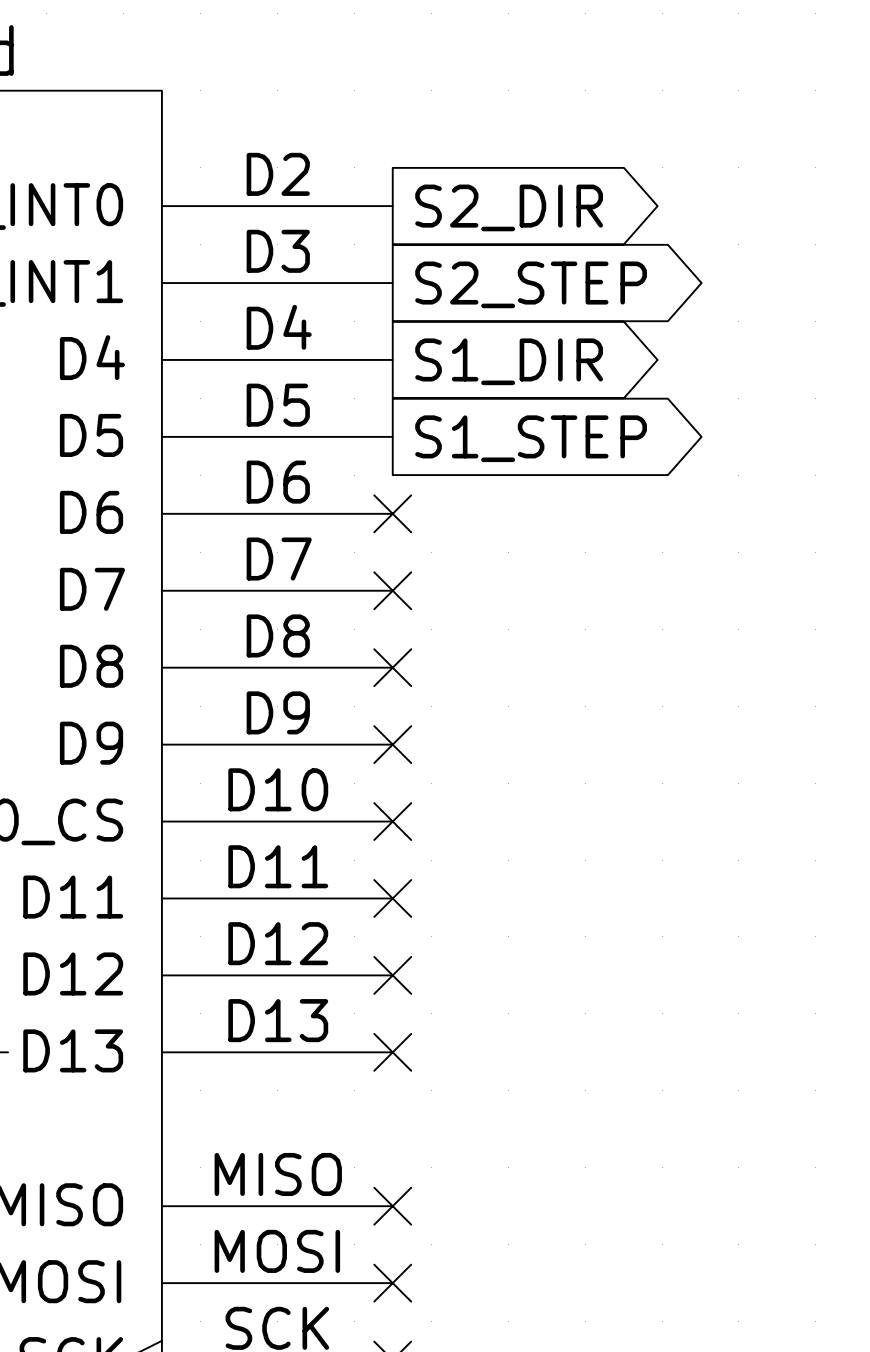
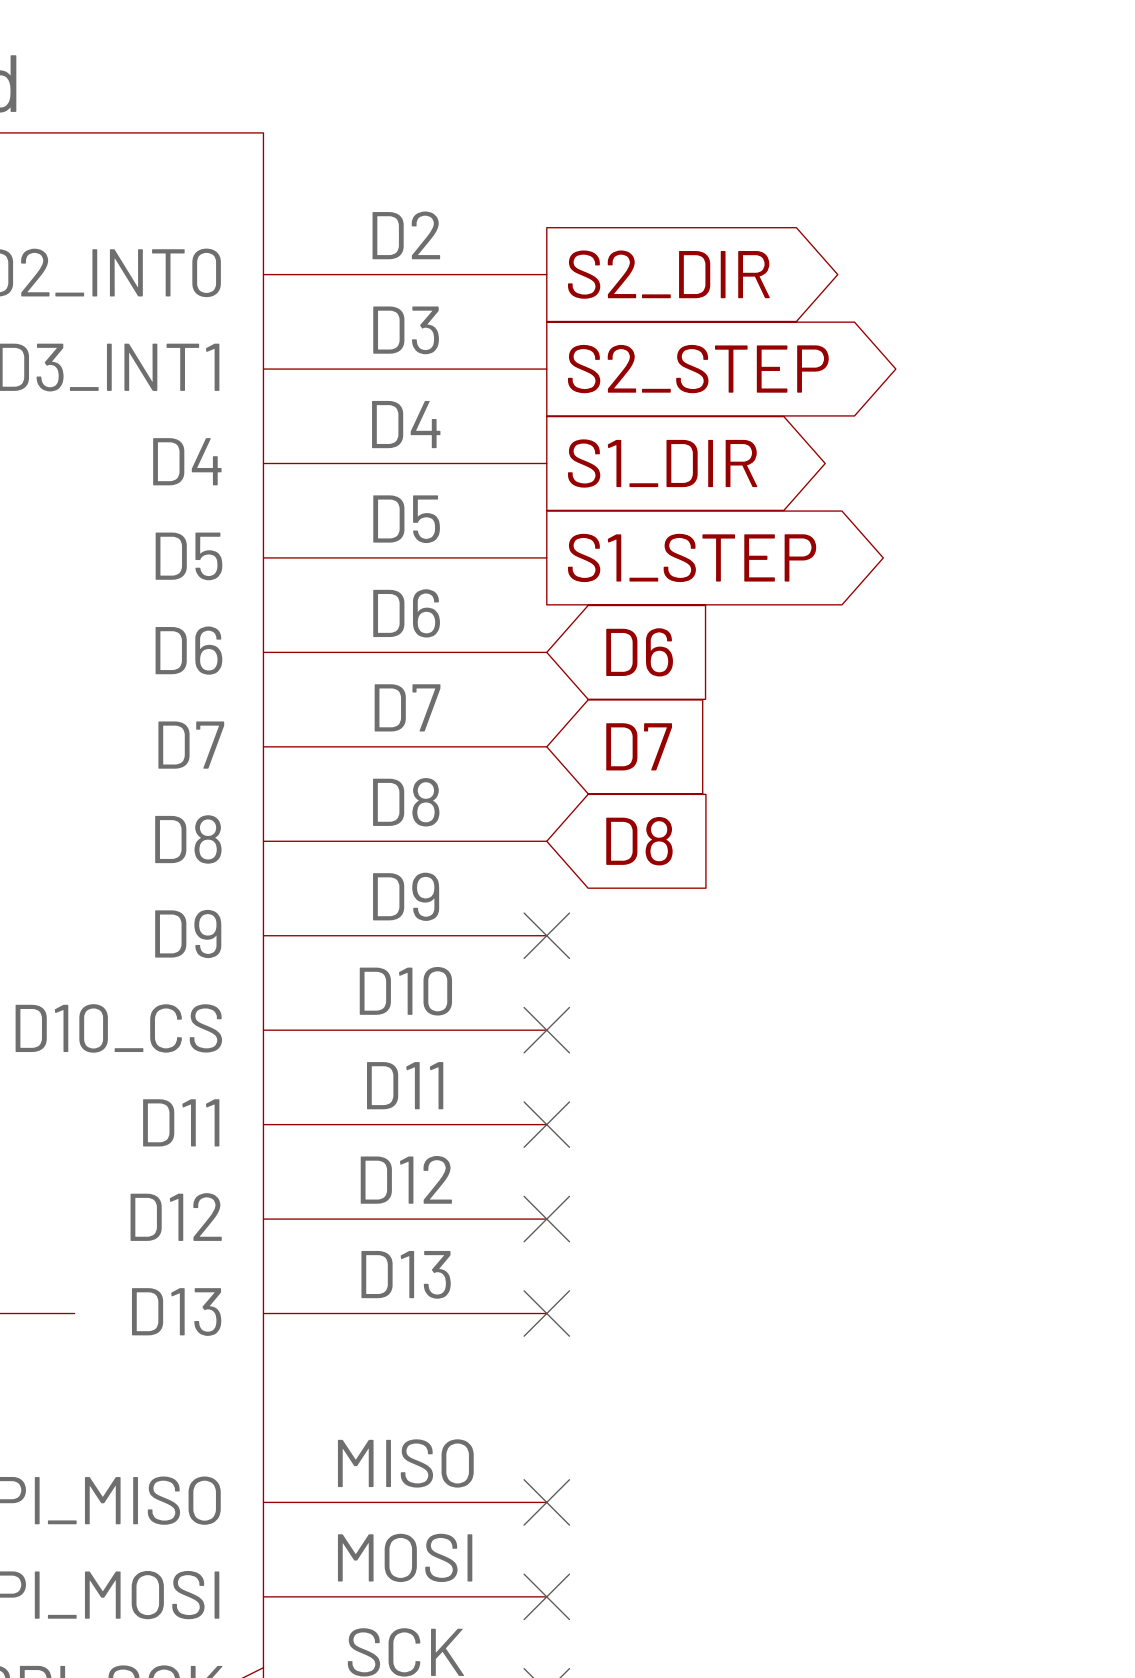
no-connect mark: (392, 513) -> none
global label: none -> D6 (639, 652)
no-connect mark: (392, 590) -> none
global label: none -> D7 (639, 746)
no-connect mark: (392, 667) -> none
global label: none -> D8 (639, 841)

